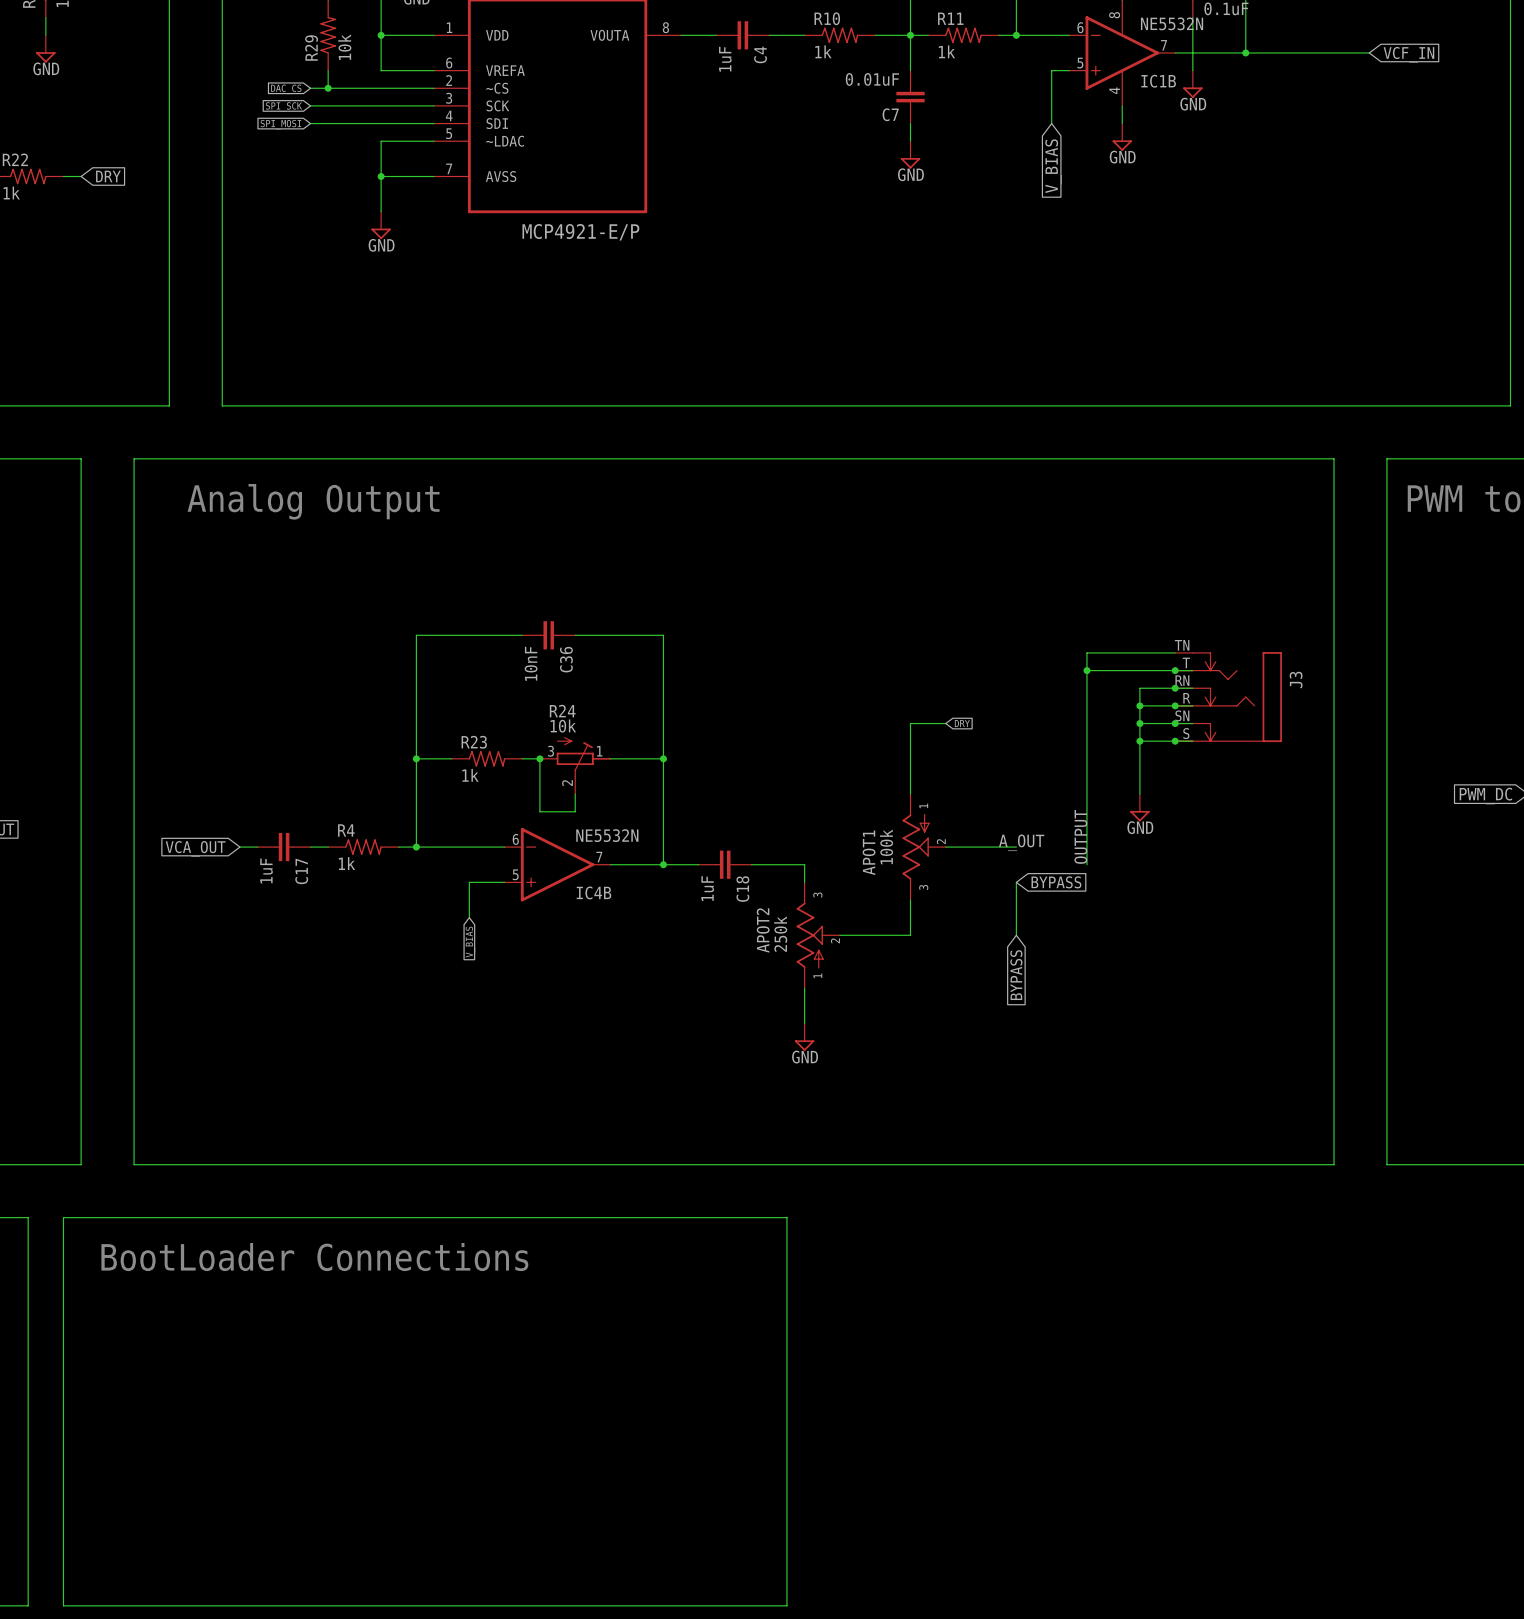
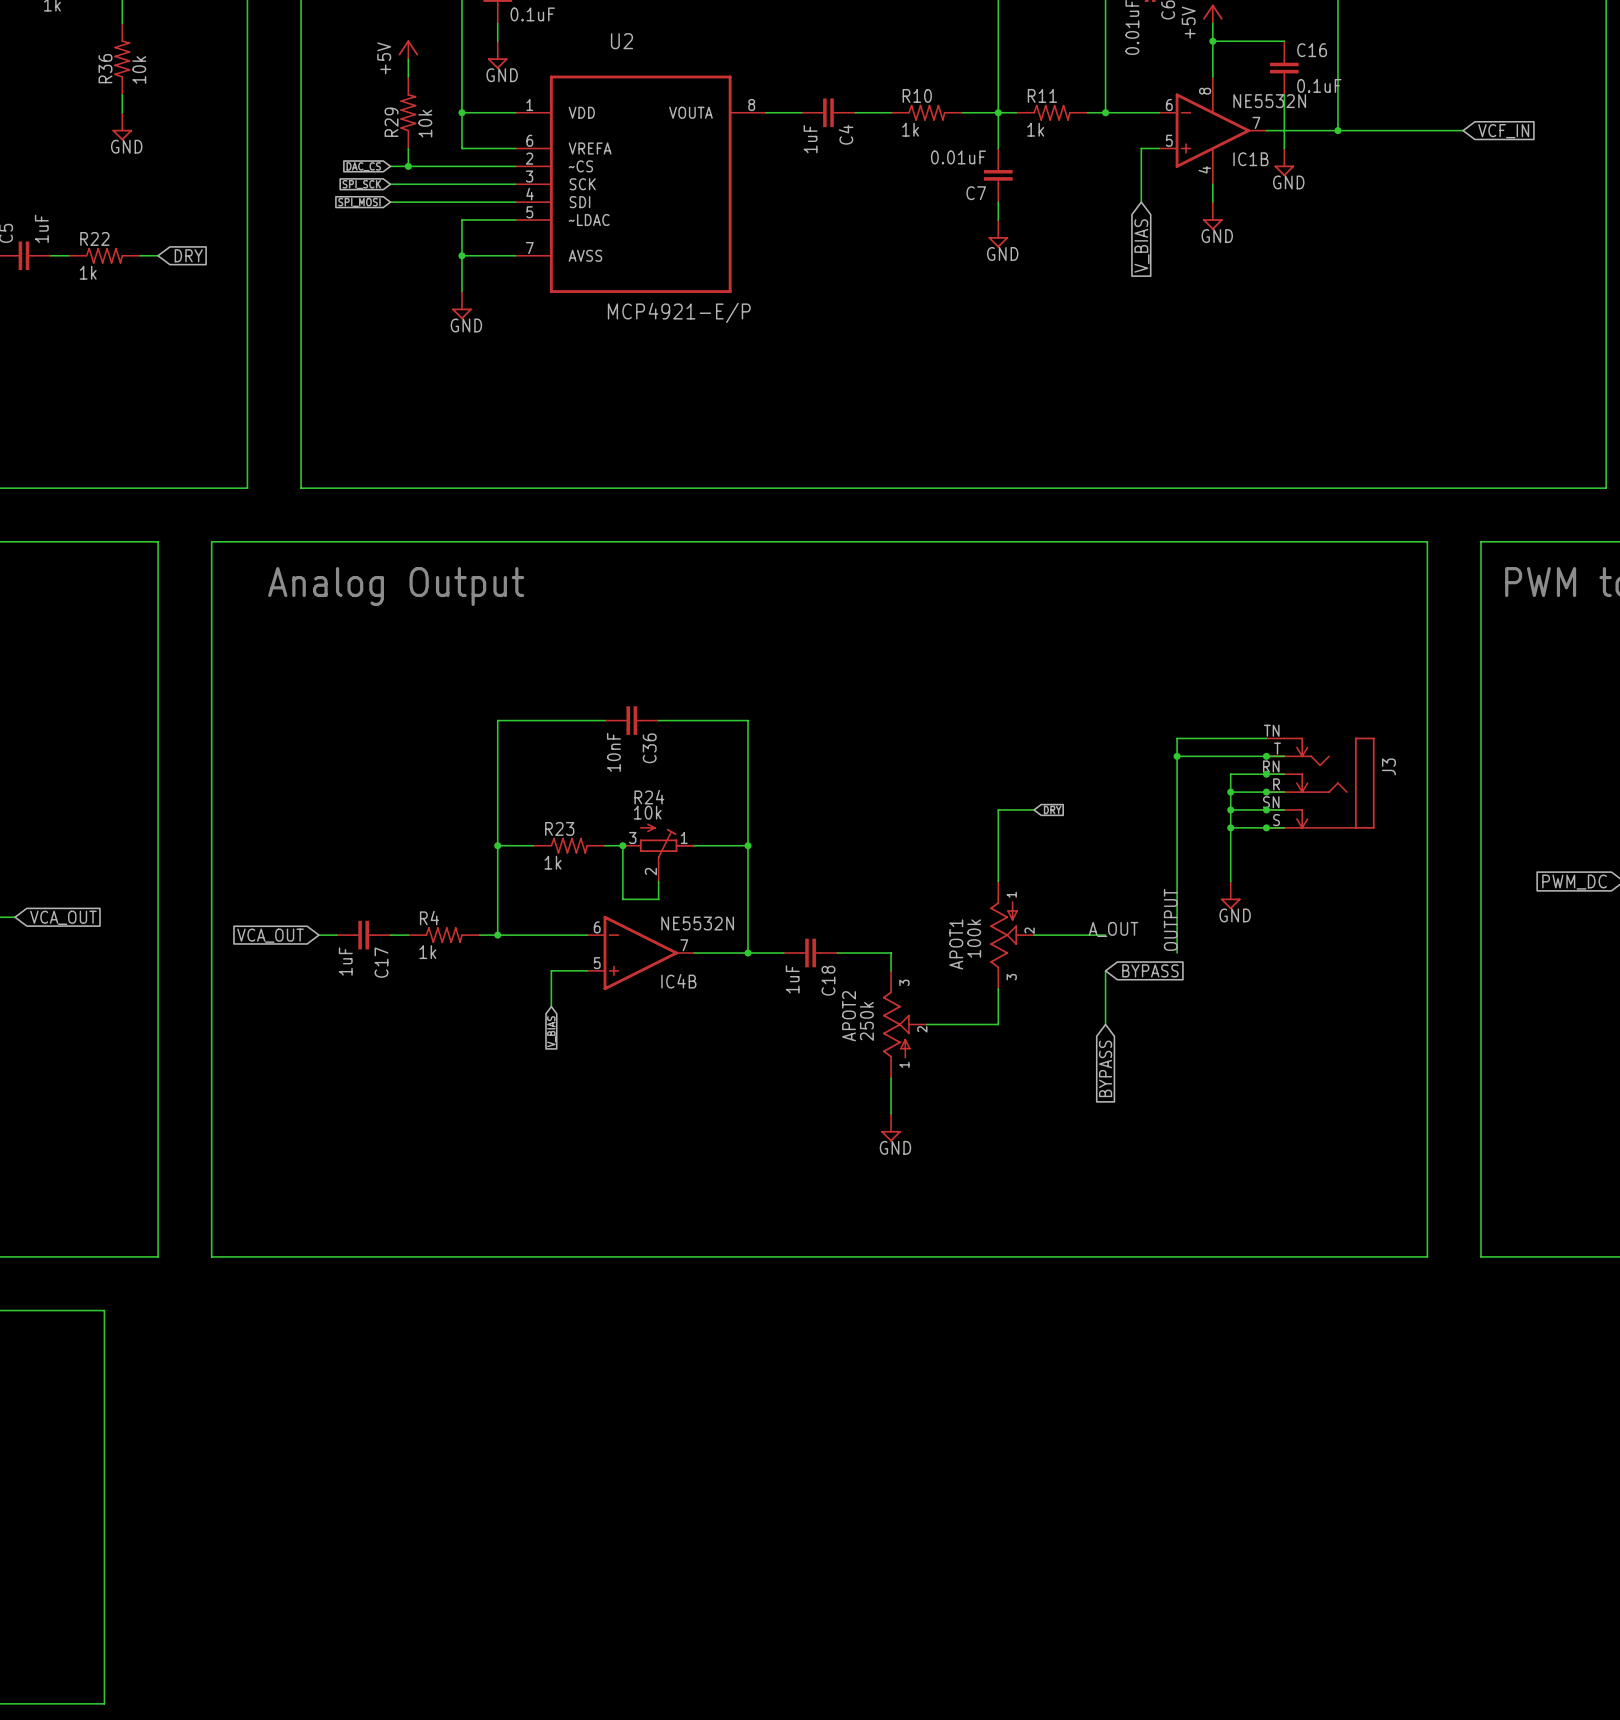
wire: (63, 1217) (63, 1605) (786, 1605) (786, 1217) (63, 1217) -> none
text: BootLoader Connections (314, 1257) -> none

